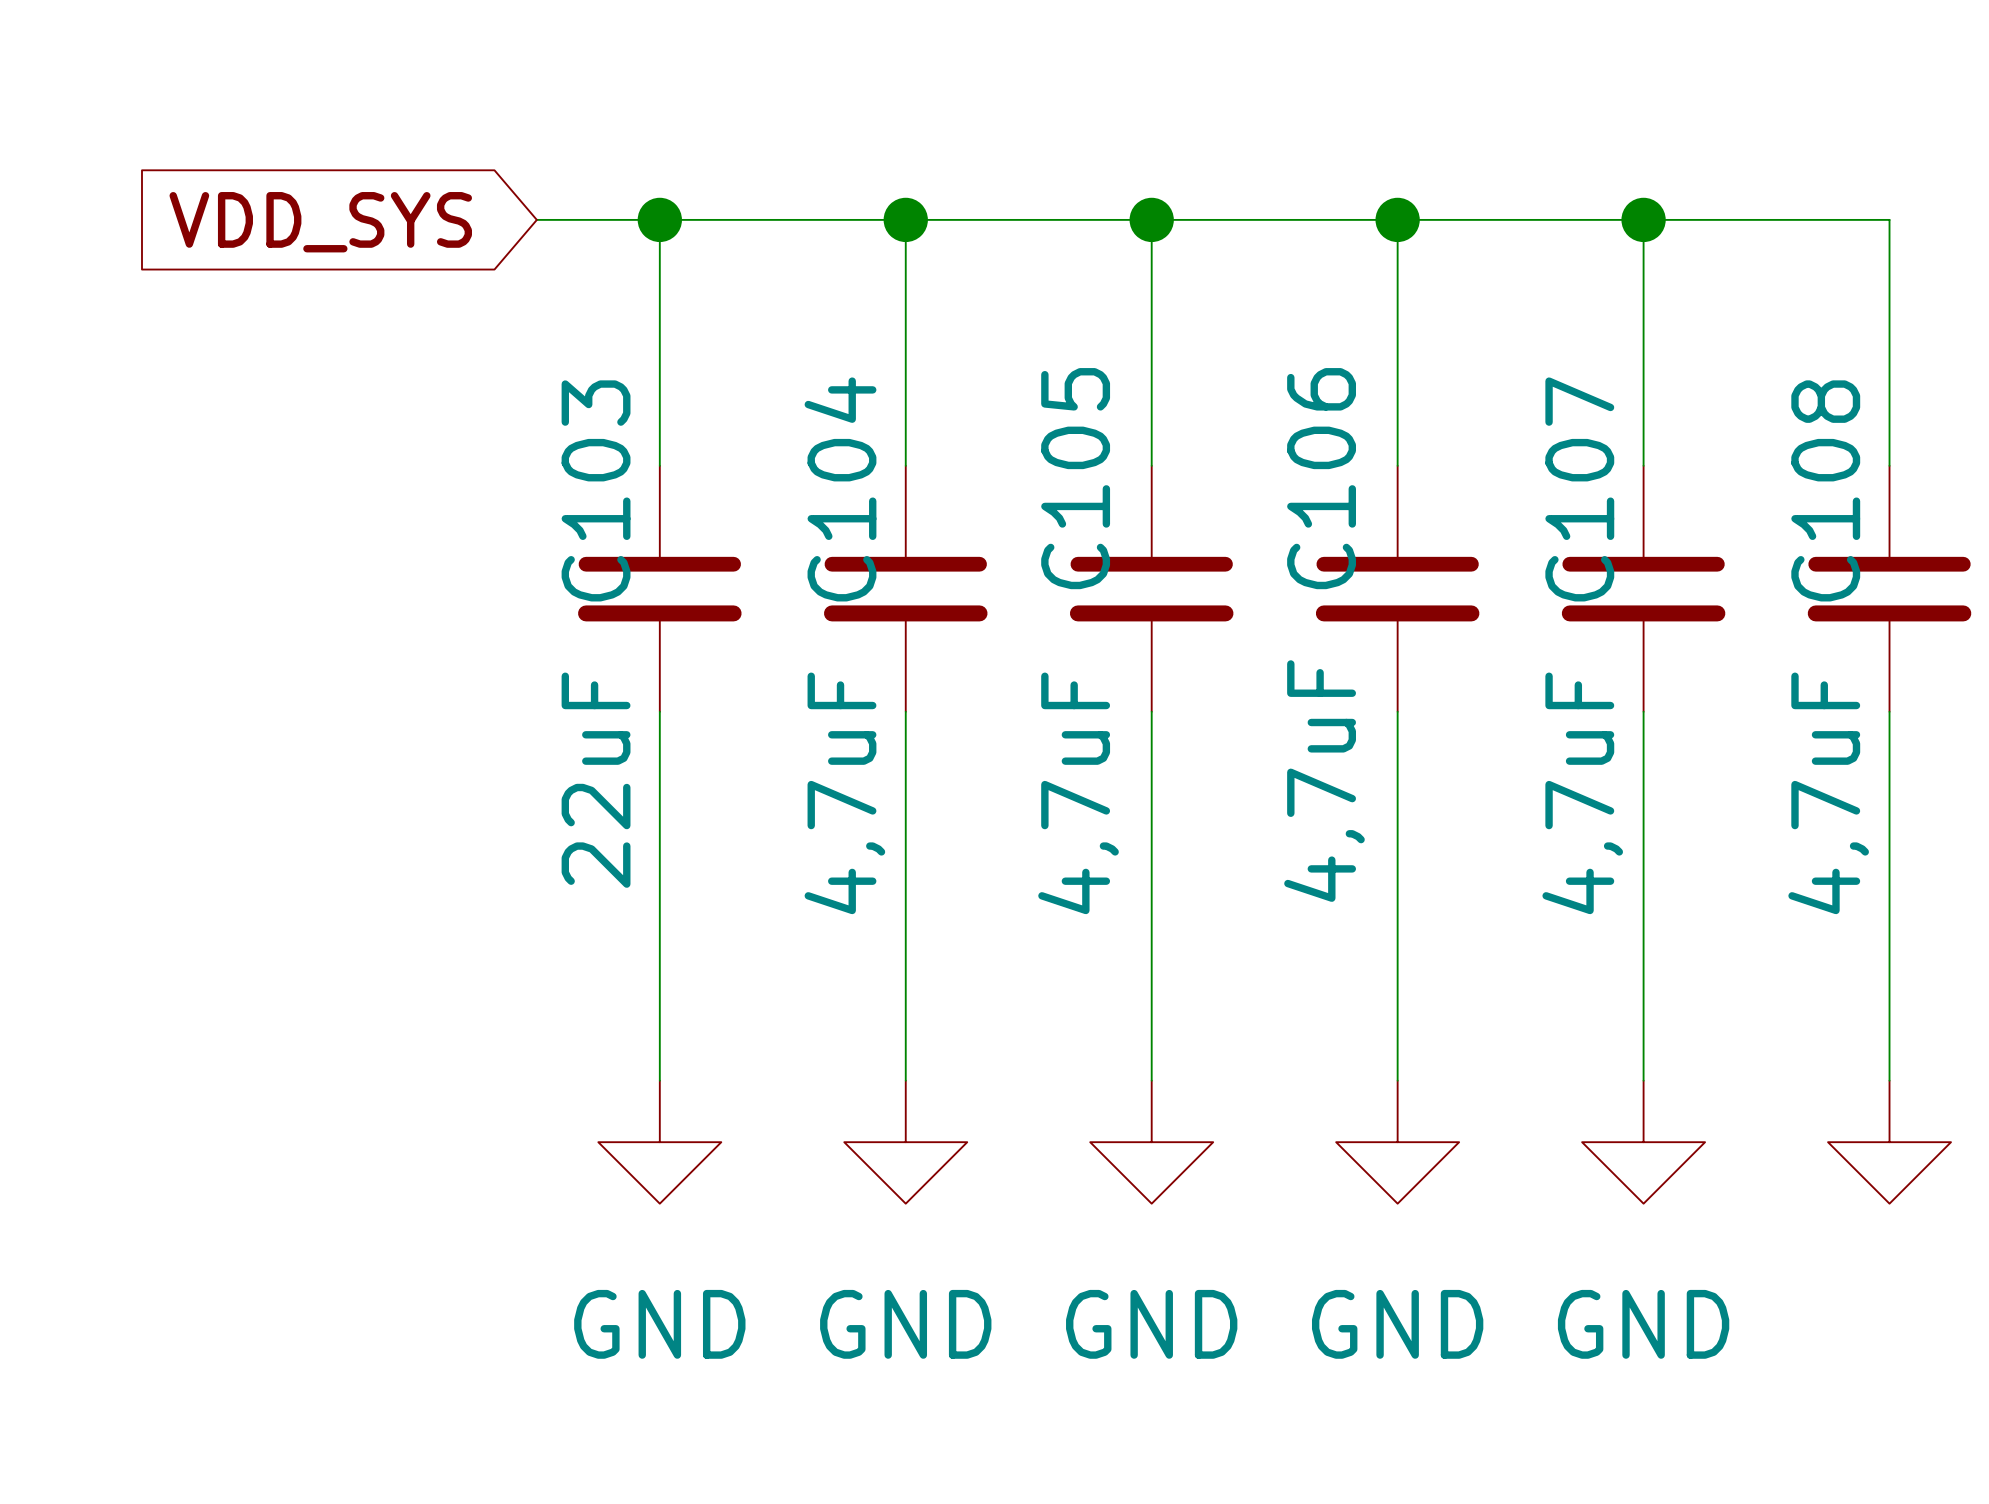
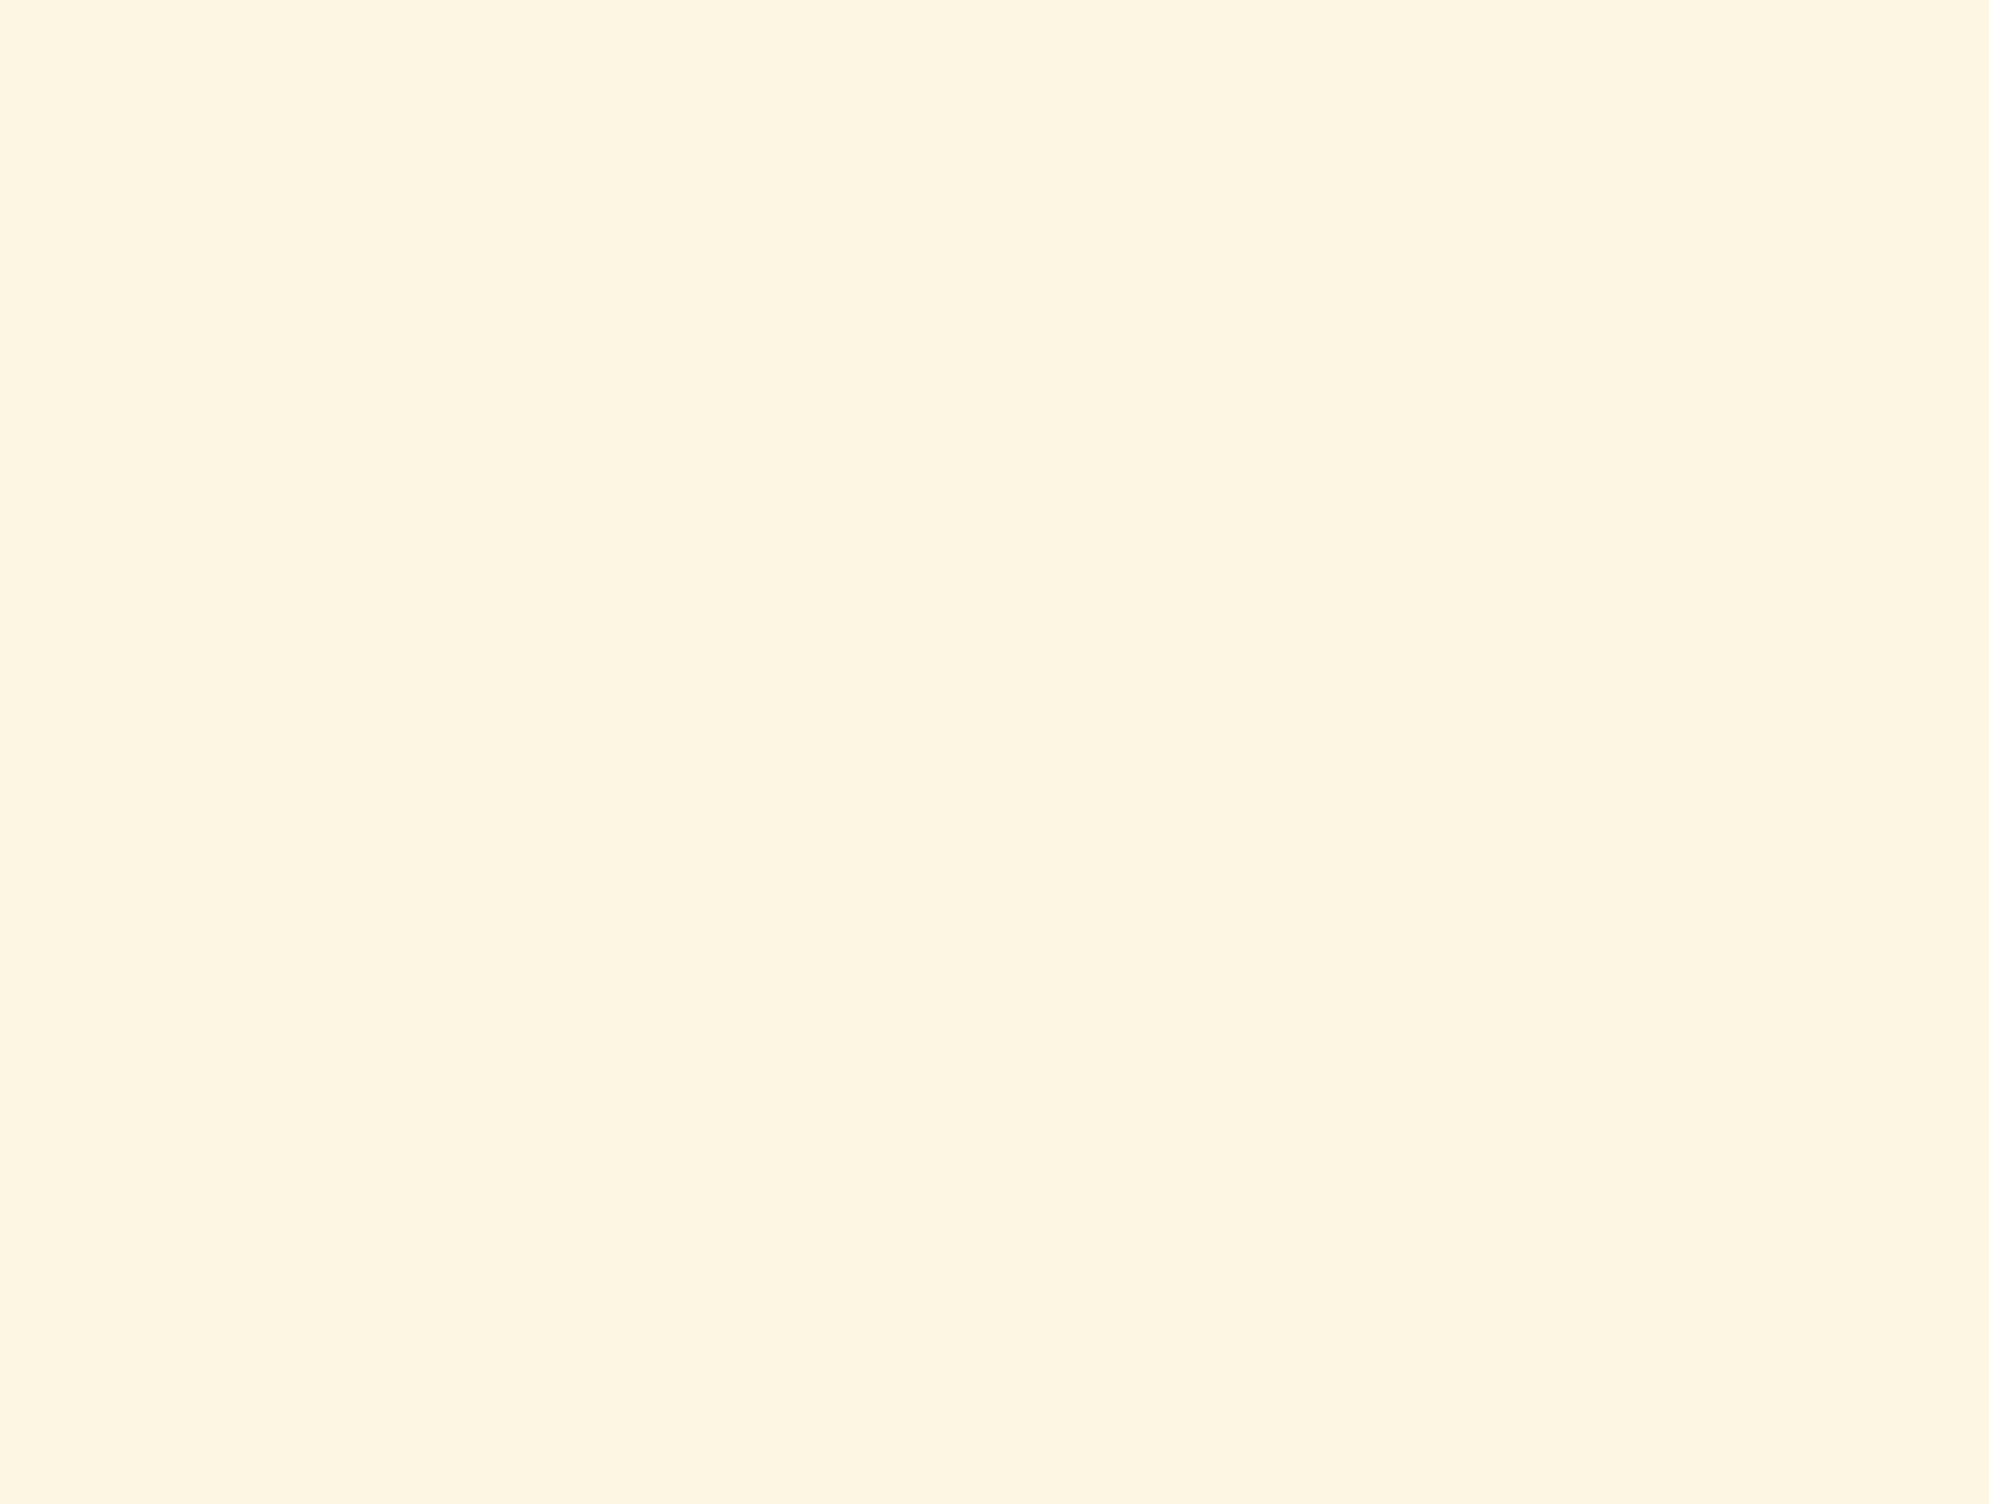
wire: (536, 219) (1889, 219) (1889, 465) -> none
wire: (659, 219) (659, 465) -> none
junction: (659, 219) -> none
wire: (905, 219) (905, 465) -> none
junction: (905, 219) -> none
wire: (1151, 219) (1151, 465) -> none
junction: (1151, 219) -> none
wire: (1397, 219) (1397, 465) -> none
junction: (1397, 219) -> none
wire: (1643, 219) (1643, 465) -> none
junction: (1643, 219) -> none
global label: VDD_SYS (320, 222) -> none
C103: 22uF (659, 588) -> none
C104: 4,7uF (905, 588) -> none
C105: 4,7uF (1151, 588) -> none
C106: 4,7uF (1397, 588) -> none
C107: 4,7uF (1643, 588) -> none
C108: 4,7uF (1889, 588) -> none
wire: (659, 711) (659, 1080) -> none
wire: (905, 711) (905, 1080) -> none
wire: (1151, 711) (1151, 1080) -> none
wire: (1397, 711) (1397, 1080) -> none
wire: (1643, 711) (1643, 1080) -> none
wire: (1889, 711) (1889, 1080) -> none
power symbol: GND (659, 1142) -> none
power symbol: GND (905, 1142) -> none
power symbol: GND (1151, 1142) -> none
power symbol: GND (1397, 1142) -> none
power symbol: GND (1643, 1142) -> none
power symbol: (1889, 1142) -> none

